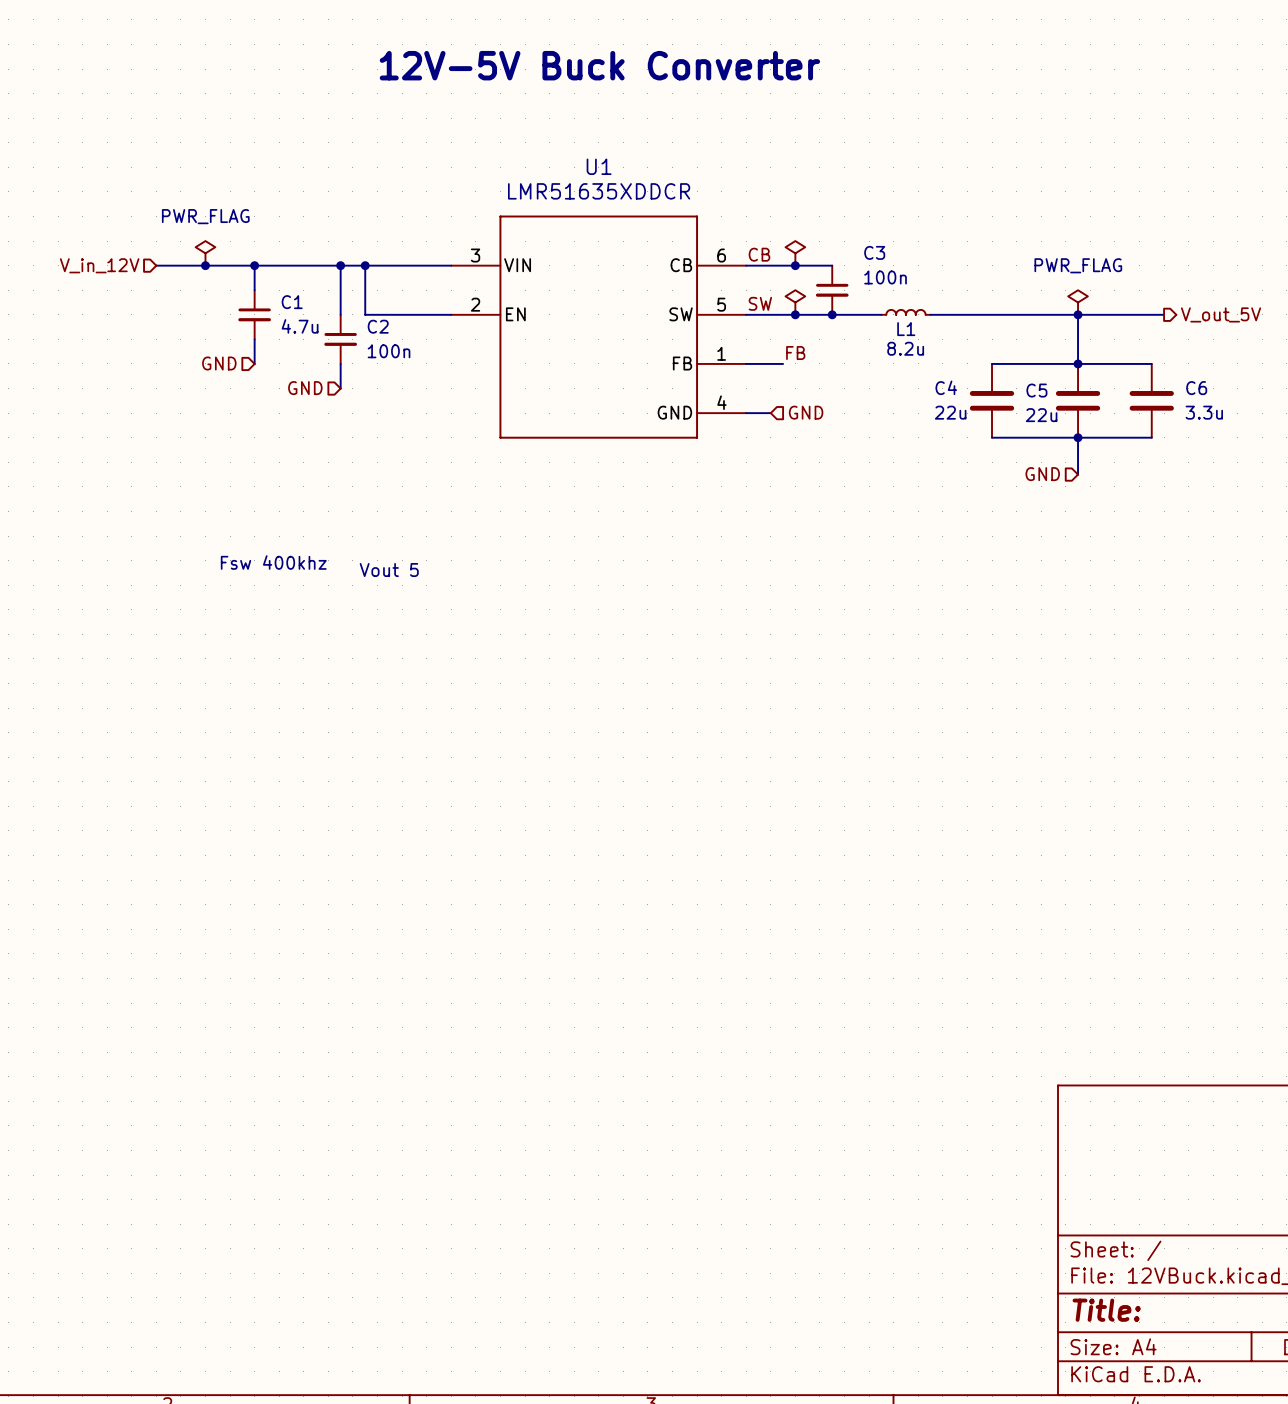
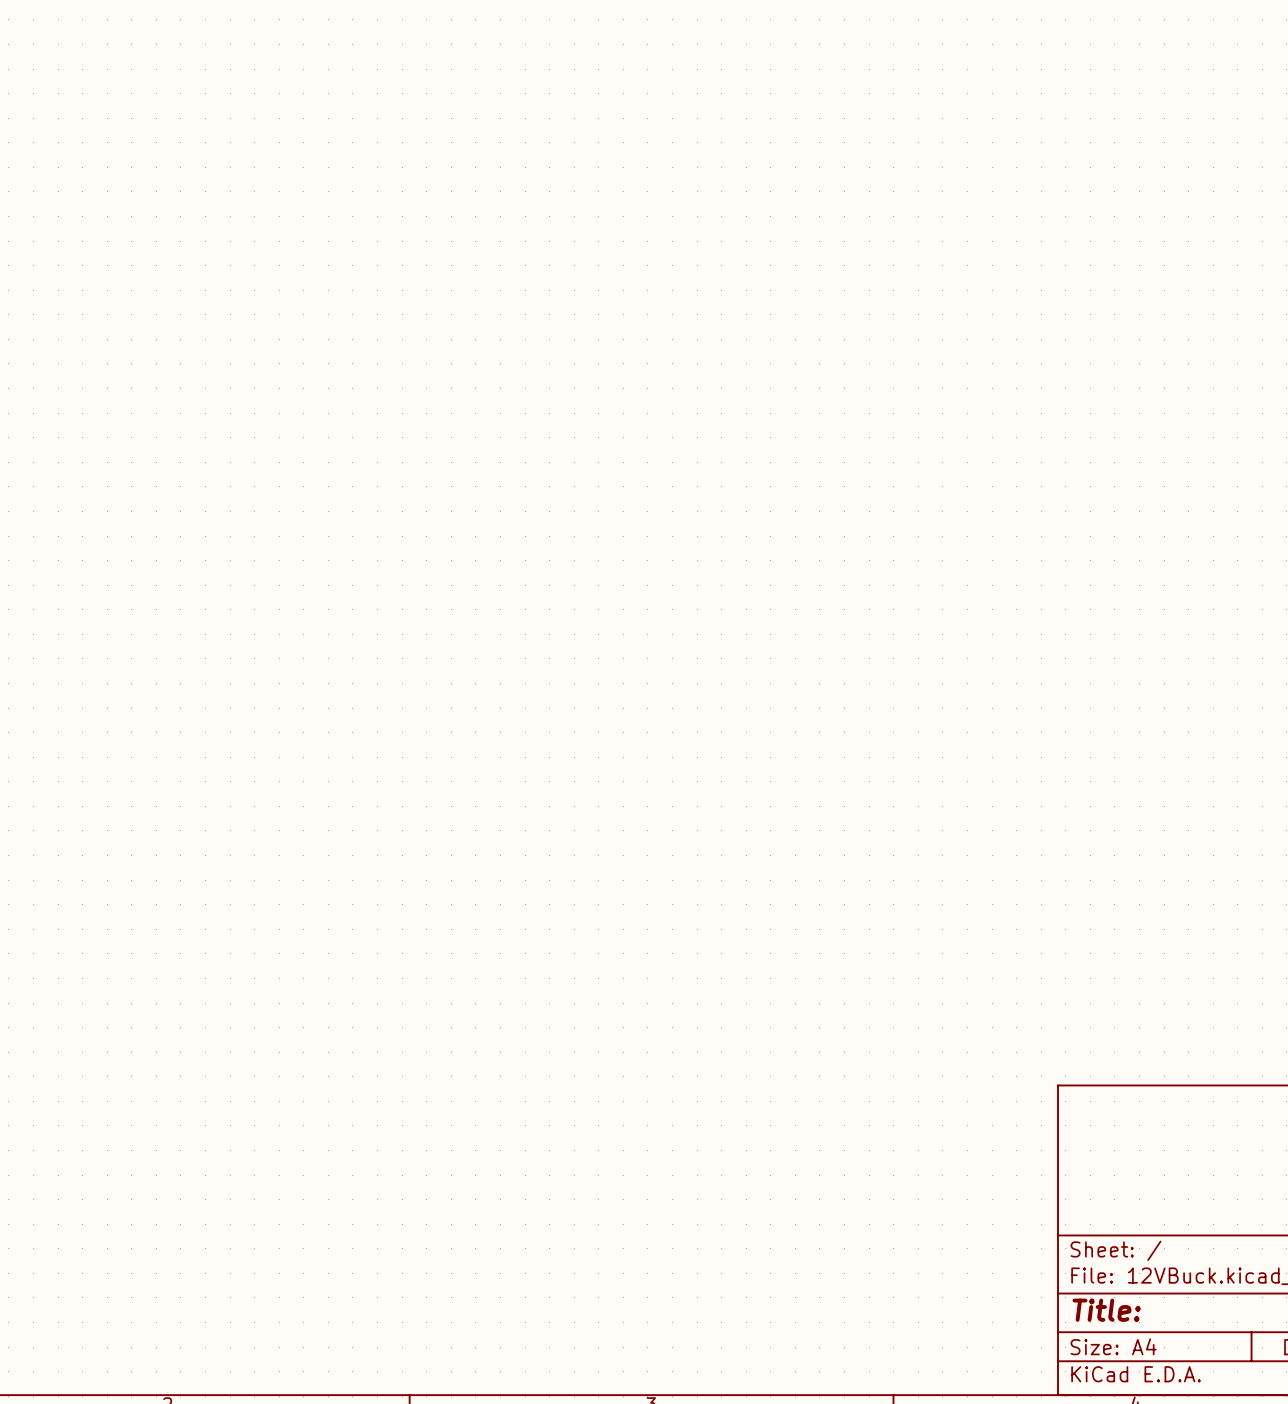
text: 12V-5V Buck Converter (599, 65) -> none
power symbol: PWR_FLAG (205, 253) -> none
power symbol: (795, 253) -> none
label: CB (759, 254) -> none
hierarchical label: V_in_12V (99, 265) -> none
wire: (156, 265) (451, 265) -> none
junction: (205, 265) -> none
wire: (254, 265) (254, 290) -> none
junction: (254, 265) -> none
wire: (340, 265) (340, 314) -> none
junction: (340, 265) -> none
wire: (365, 265) (365, 314) (451, 314) -> none
junction: (365, 265) -> none
wire: (746, 265) (832, 265) -> none
junction: (795, 265) -> none
C3: 100n (832, 290) -> none
power symbol: (795, 302) -> none
power symbol: PWR_FLAG (1078, 302) -> none
label: SW (760, 303) -> none
L1: 8.2u (905, 312) -> none
C1: 4.7u (254, 314) -> none
wire: (746, 314) (881, 314) -> none
junction: (795, 314) -> none
junction: (832, 314) -> none
wire: (930, 314) (1164, 314) -> none
wire: (1078, 314) (1078, 363) -> none
junction: (1078, 314) -> none
hierarchical label: V_out_5V (1221, 314) -> none
U1: LMR51635XDDCR (598, 327) -> none
wire: (254, 339) (254, 363) -> none
C2: 100n (340, 339) -> none
label: FB (795, 353) -> none
hierarchical label: GND (219, 363) -> none
wire: (340, 363) (340, 388) -> none
wire: (746, 363) (783, 363) -> none
wire: (992, 363) (1151, 363) -> none
junction: (1078, 363) -> none
hierarchical label: GND (305, 388) -> none
C4: 22u (992, 400) -> none
C5: 22u (1078, 400) -> none
C6: 3.3u (1151, 400) -> none
hierarchical label: GND (806, 412) -> none
wire: (746, 413) (770, 413) -> none
wire: (992, 437) (1151, 437) -> none
wire: (1078, 437) (1078, 474) -> none
junction: (1078, 437) -> none
hierarchical label: GND (1042, 474) -> none
text: Fsw 400khz (273, 562) -> none
text: Vout 5 (389, 570) -> none

